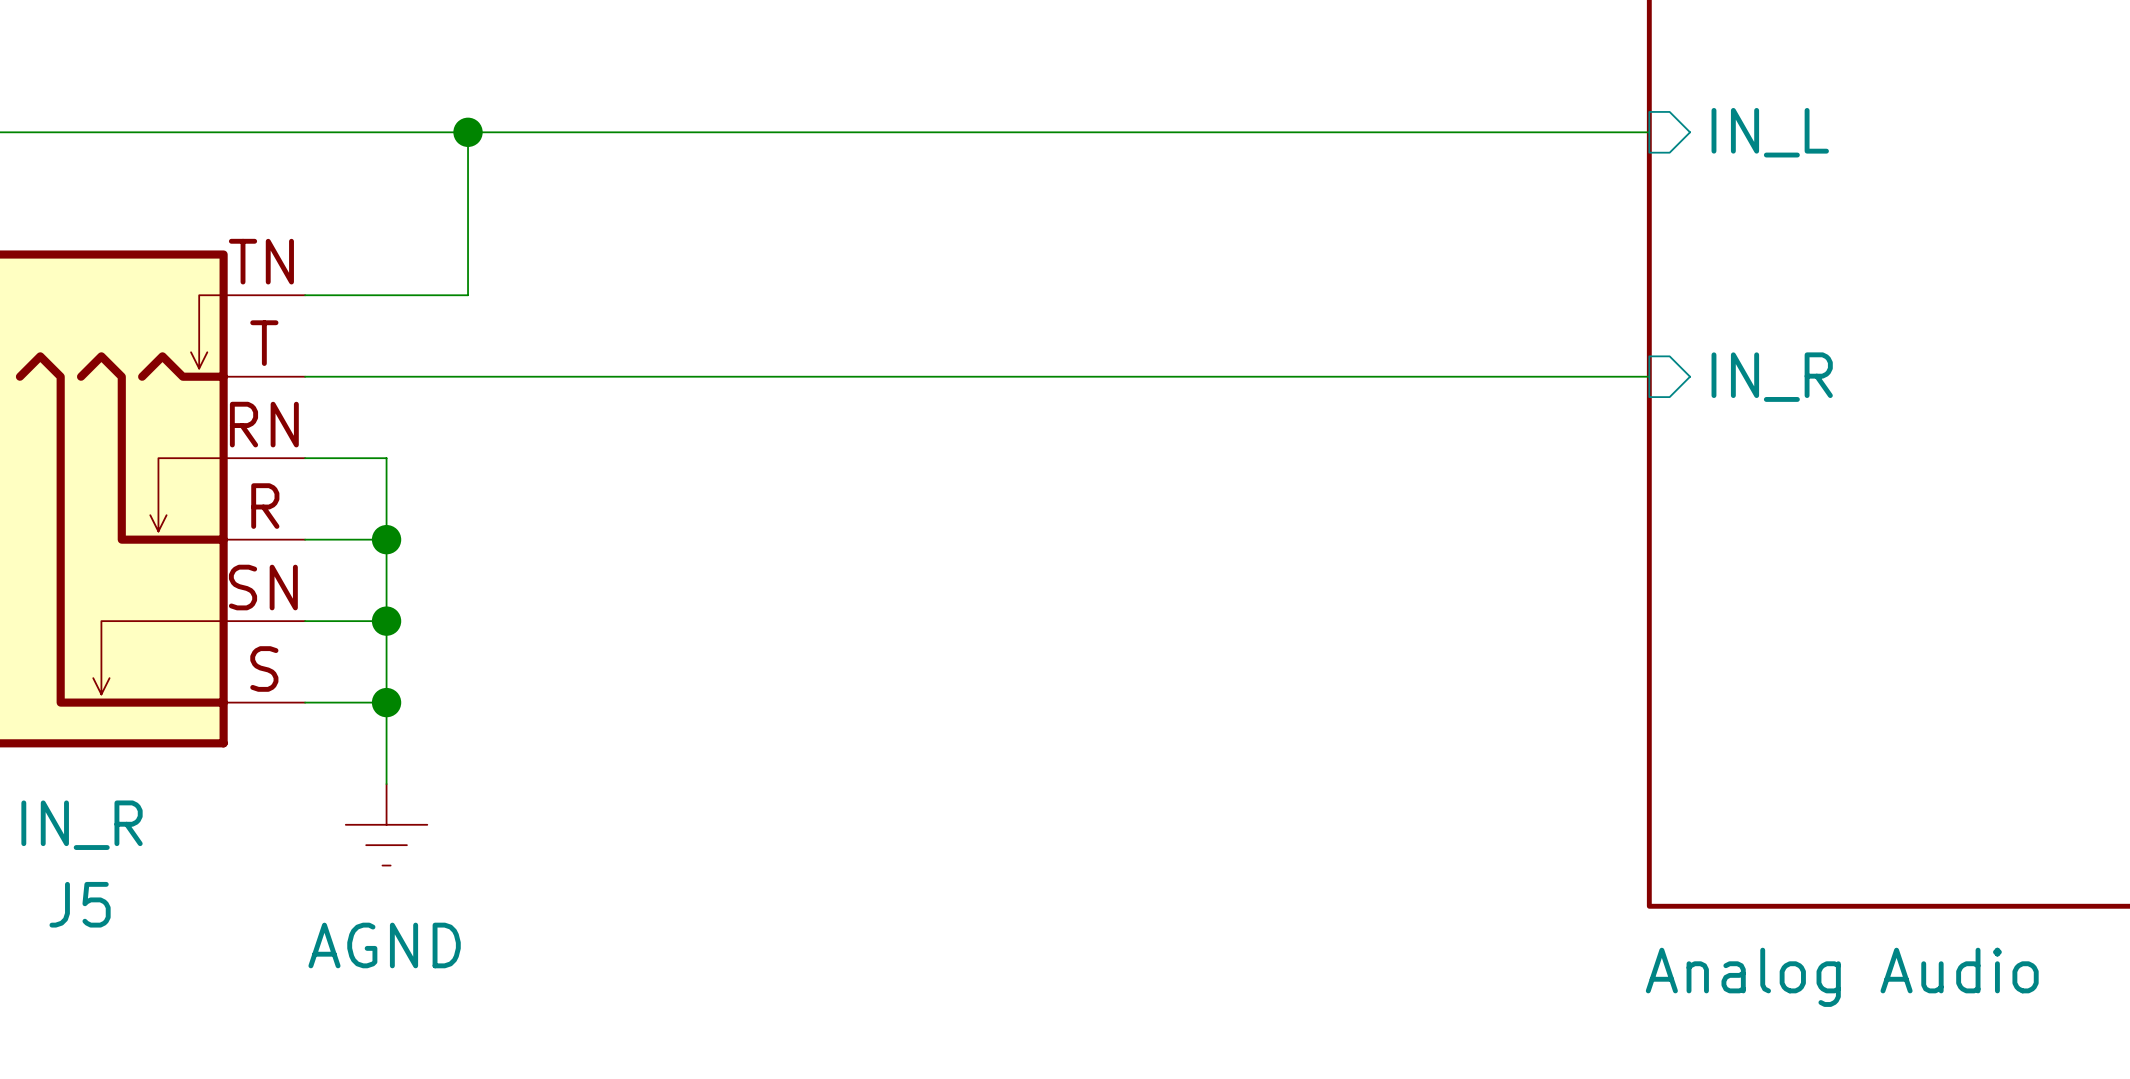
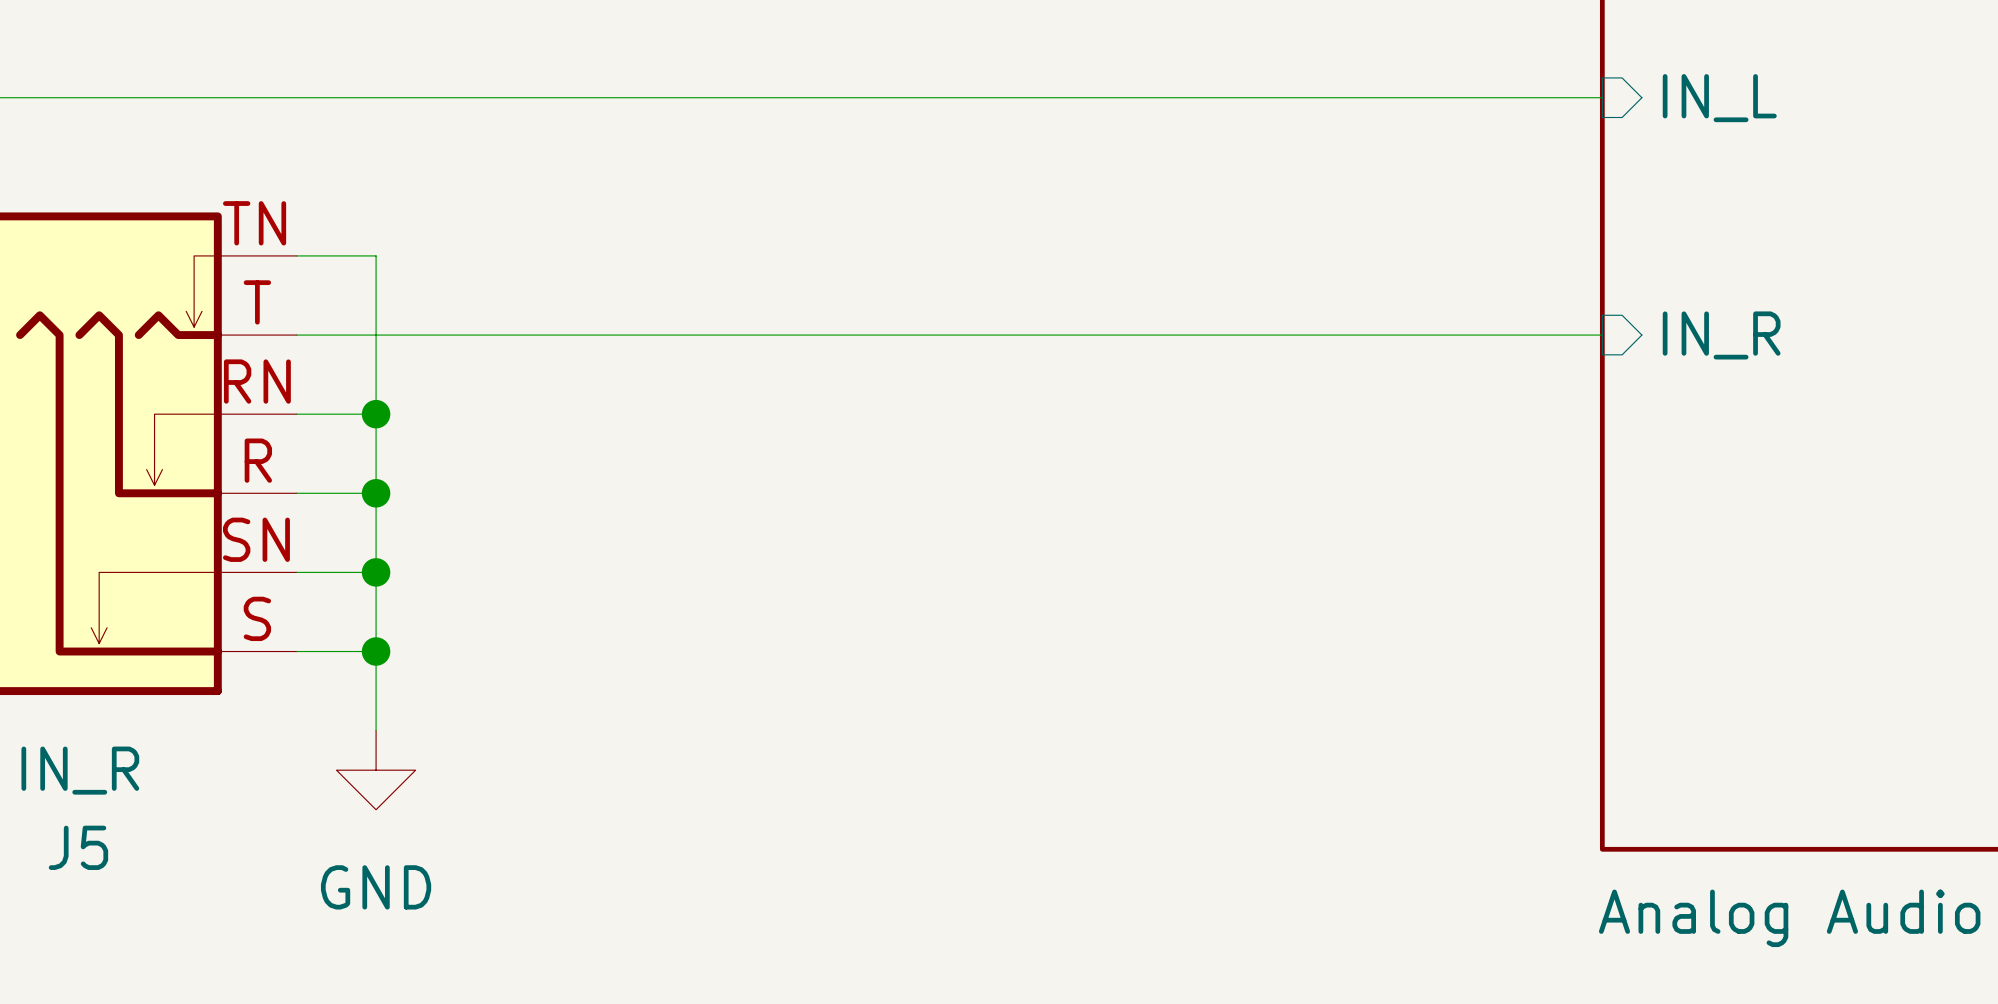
wire: (468, 132) (468, 295) (386, 295) -> (376, 414) (376, 255)
junction: (468, 132) -> none
junction: none -> (376, 414)
power symbol: AGND (386, 824) -> GND (376, 770)

